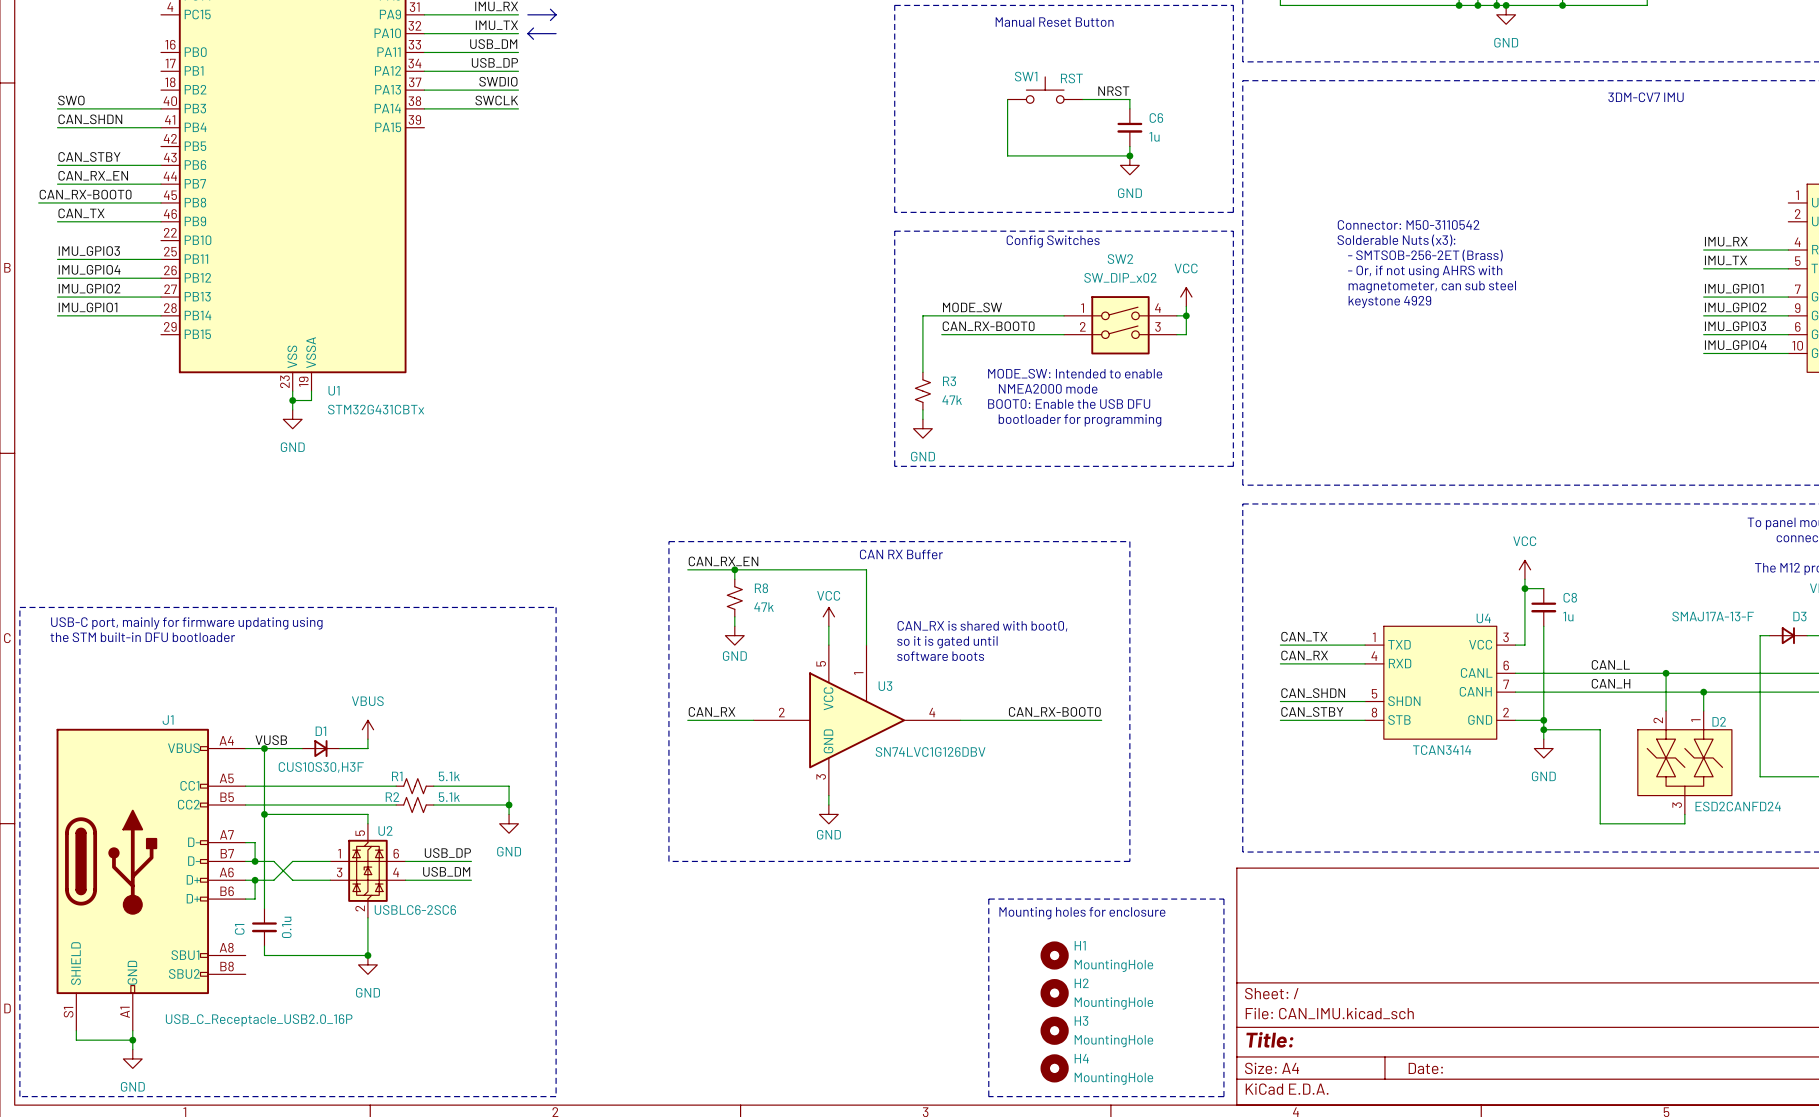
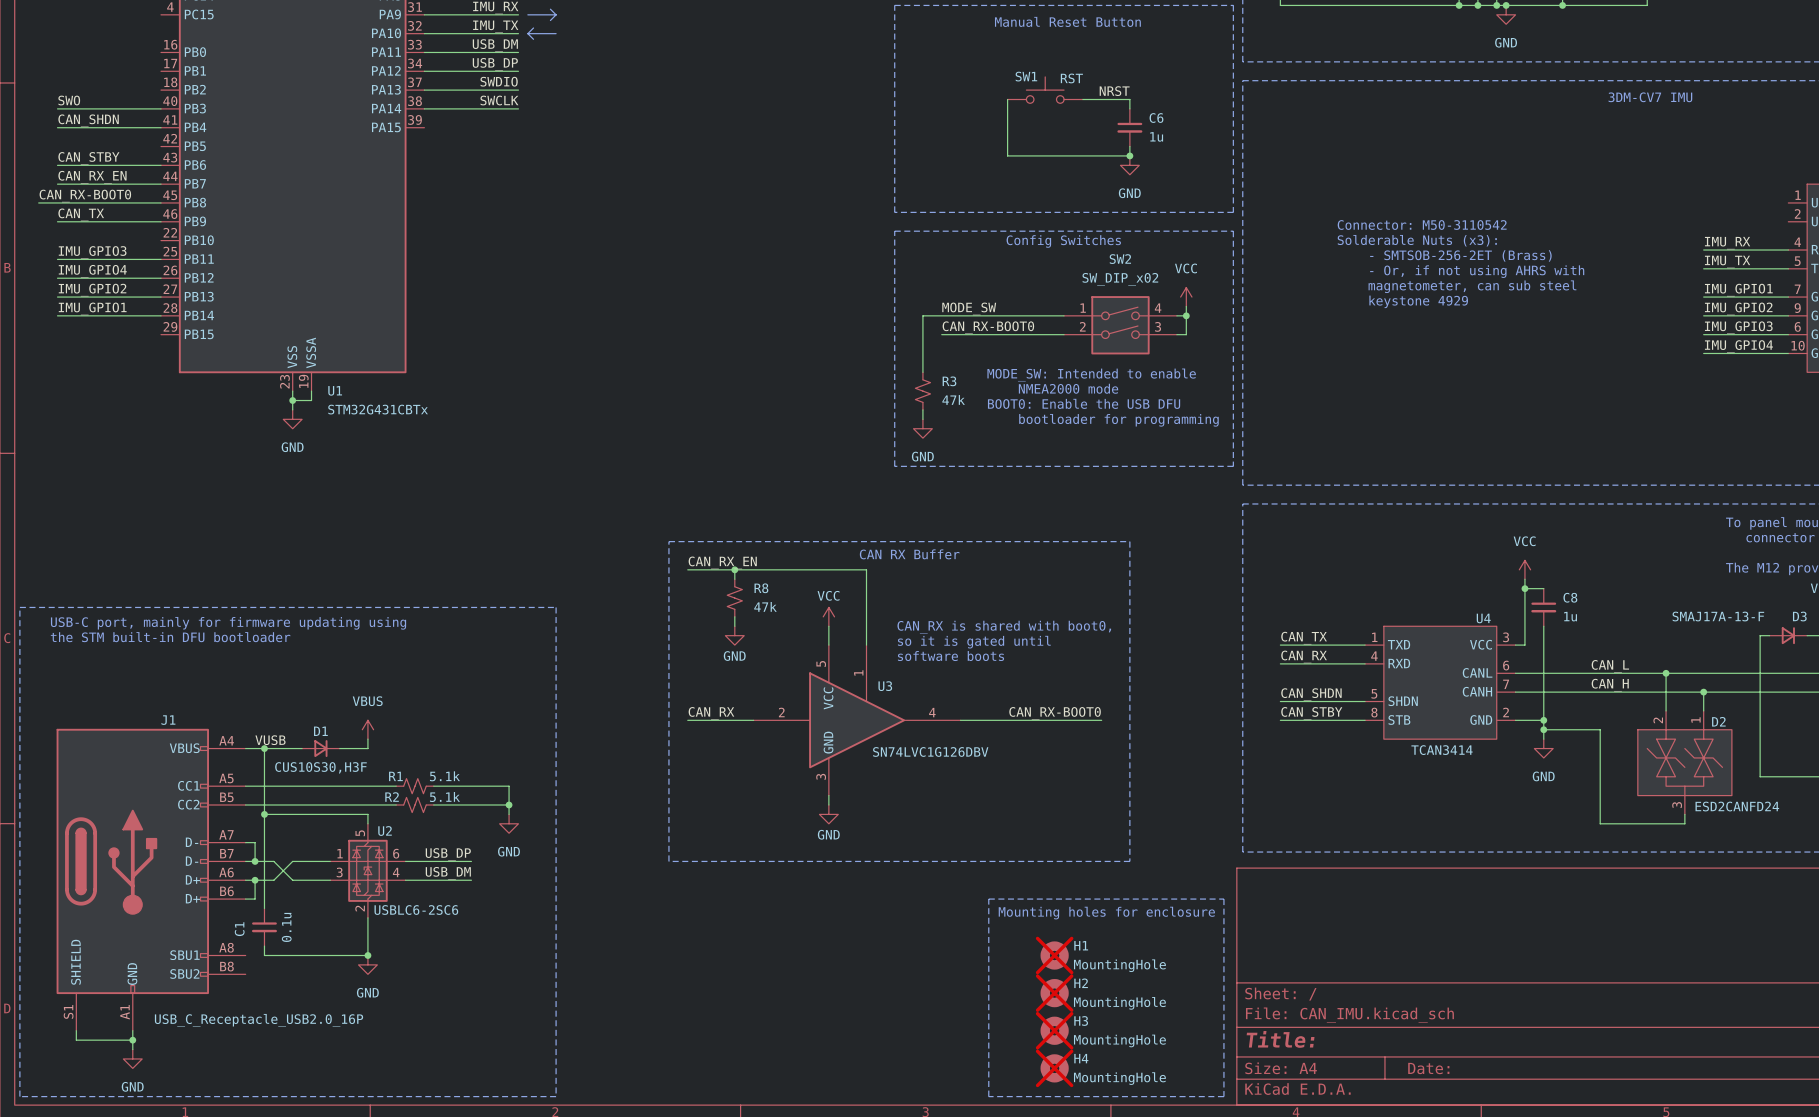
H1 do-not-place cross: none -> (1054, 955)
H2 do-not-place cross: none -> (1054, 993)
H3 do-not-place cross: none -> (1054, 1030)
H4 do-not-place cross: none -> (1054, 1068)

